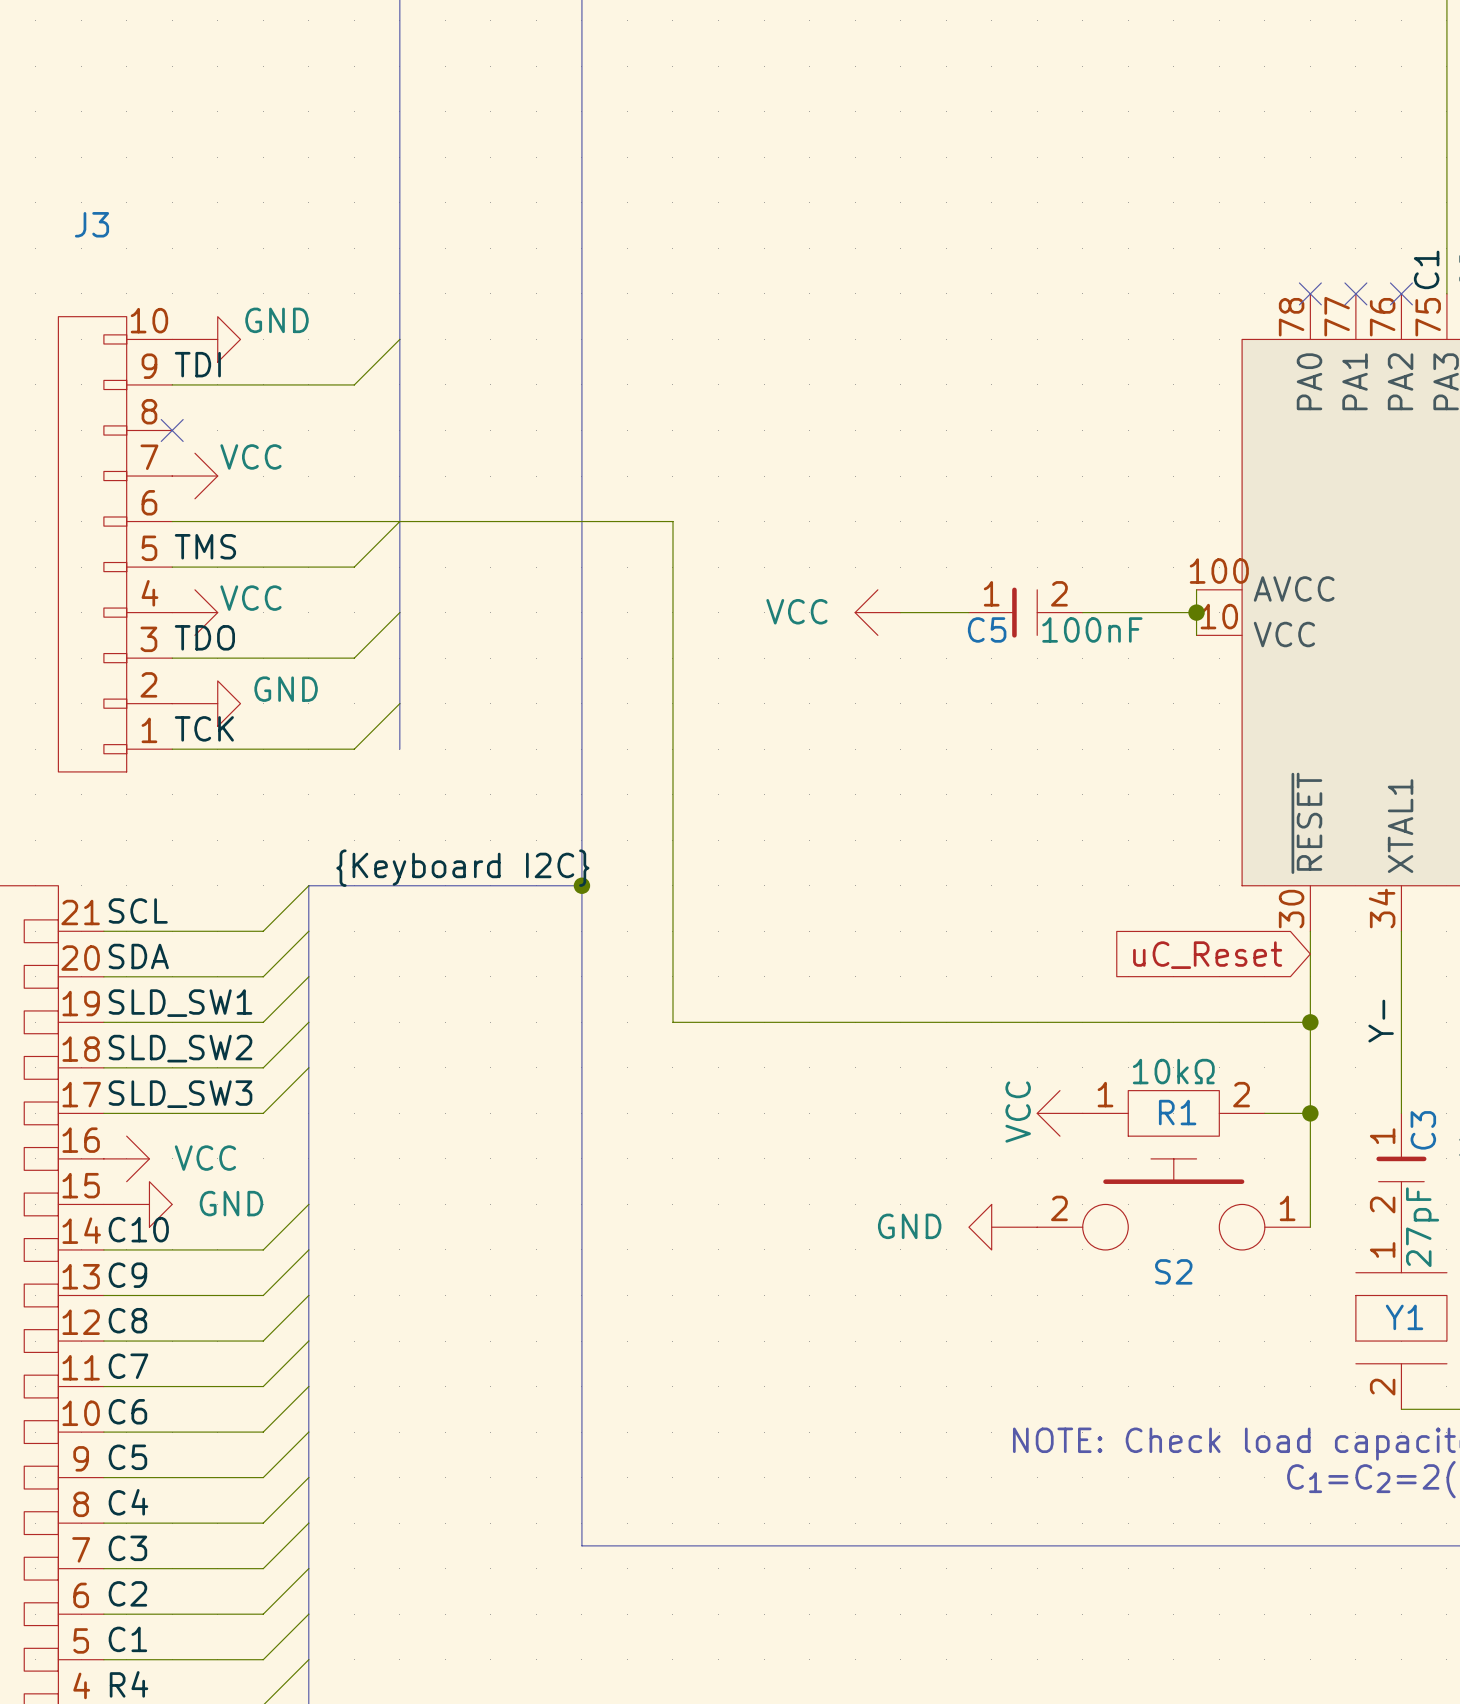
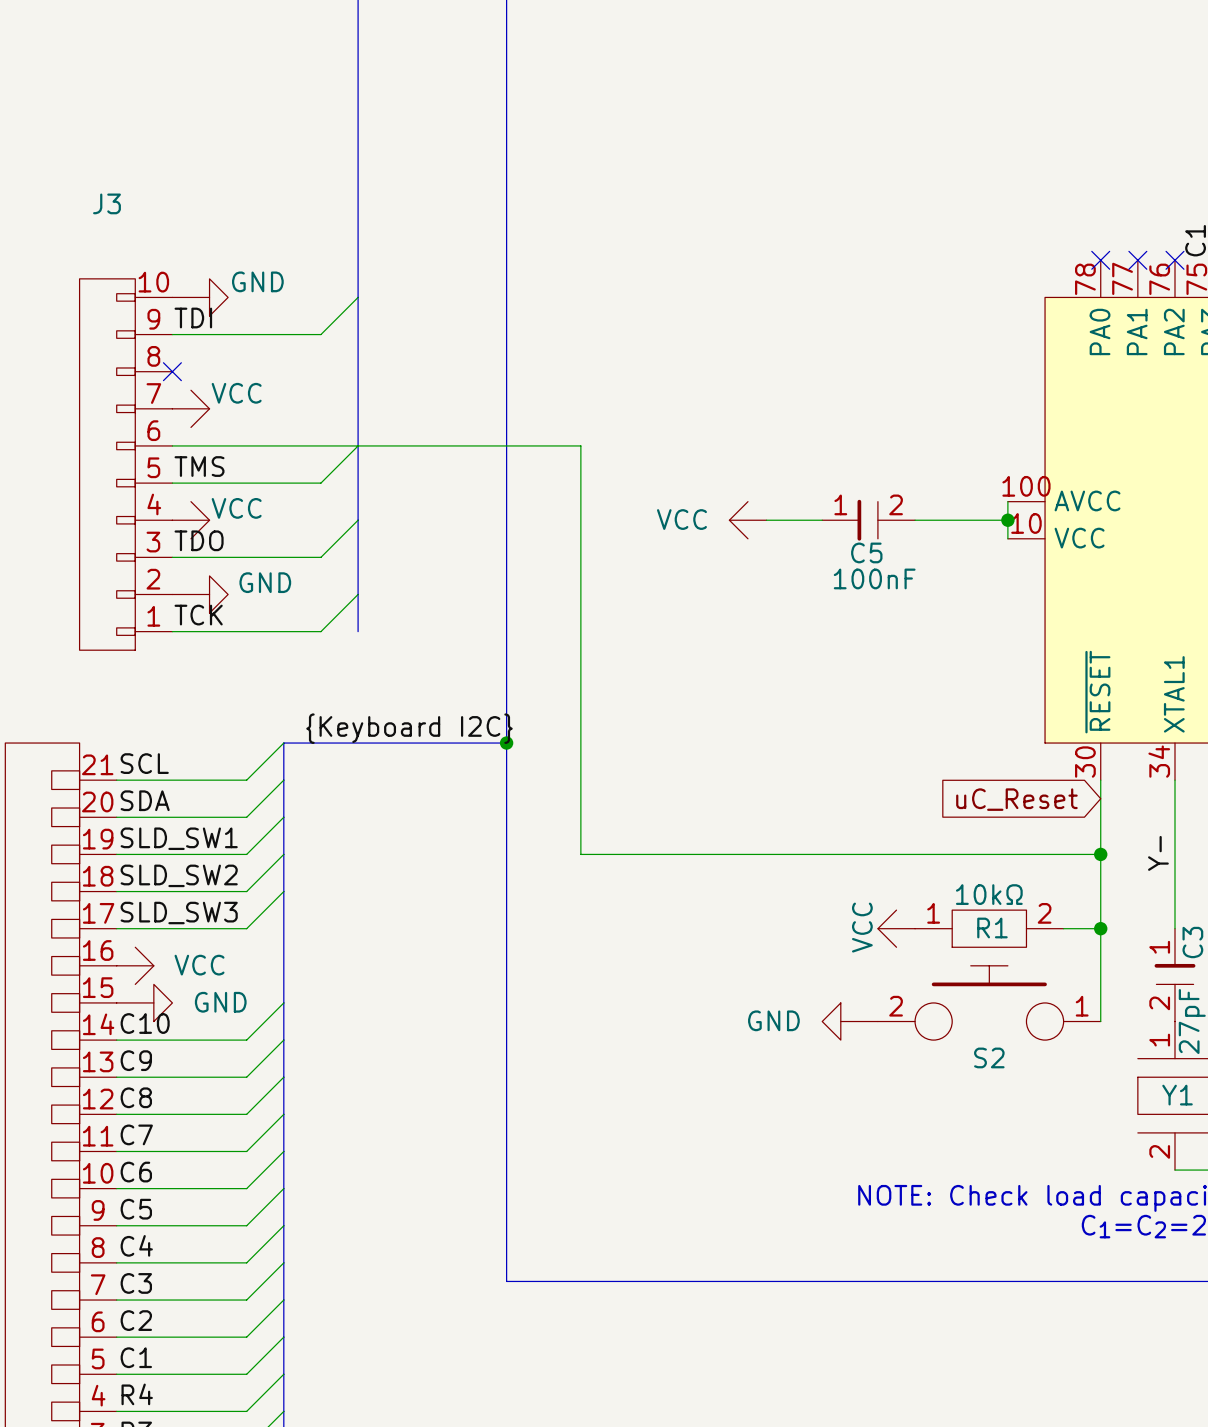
C5 name position: C5 (987, 629) -> C5 (866, 552)
C5 value position: 100nF (1092, 629) -> 100nF (874, 578)

